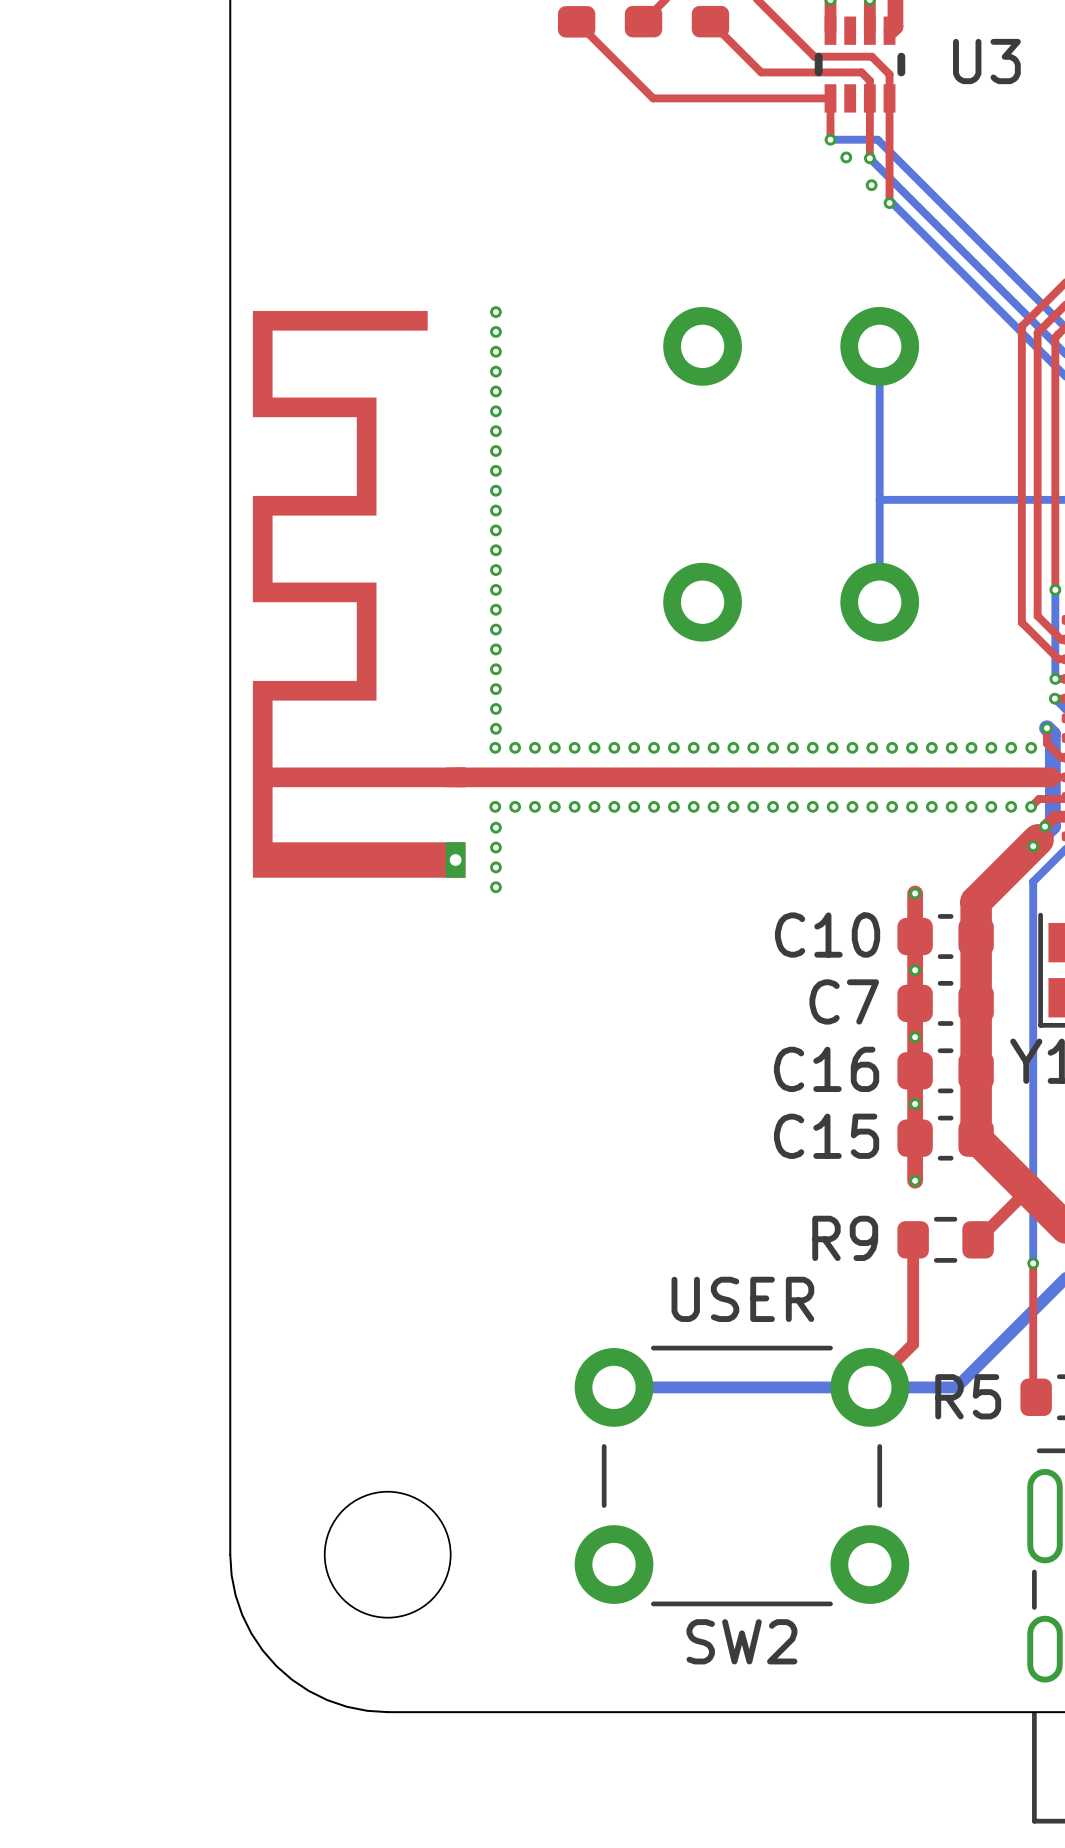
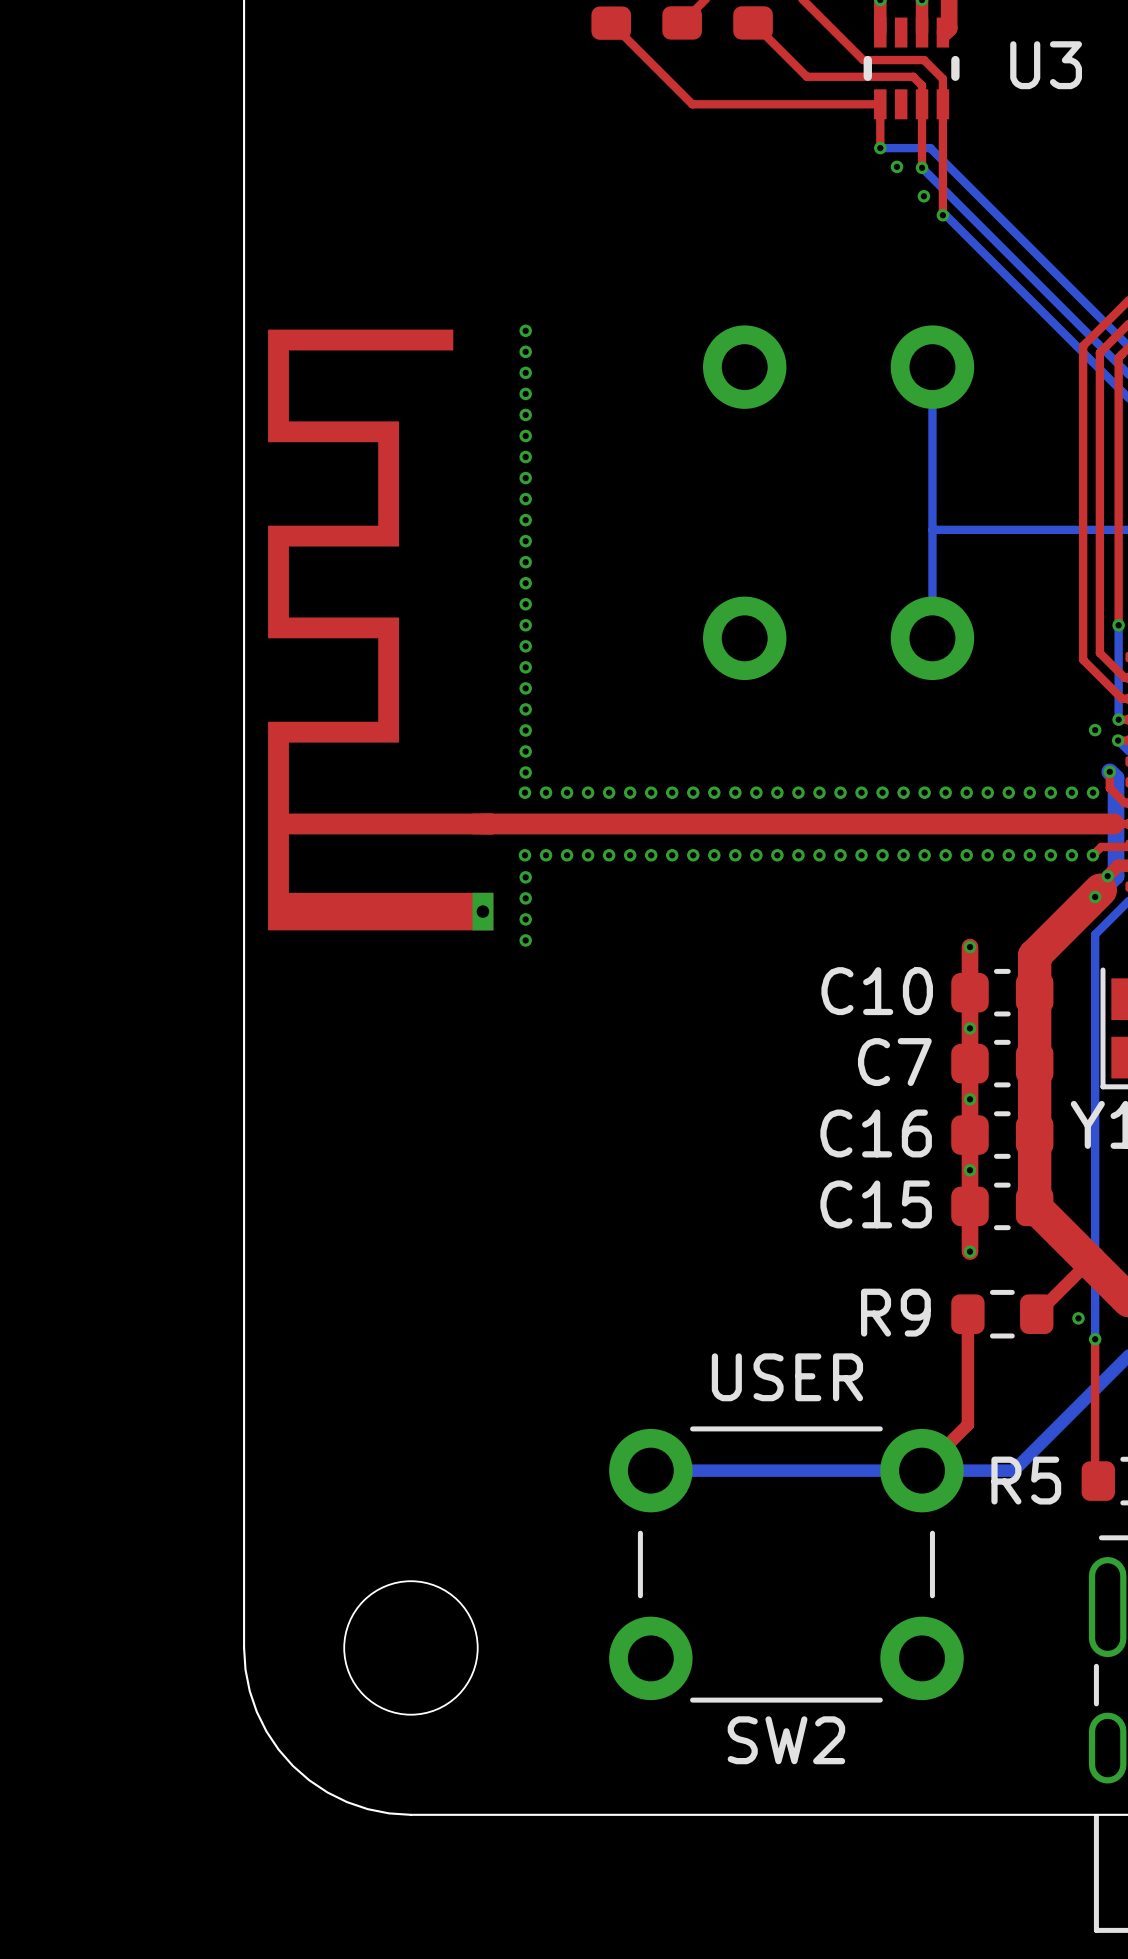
via: none -> (1095, 730)
via: none -> (1078, 1318)

